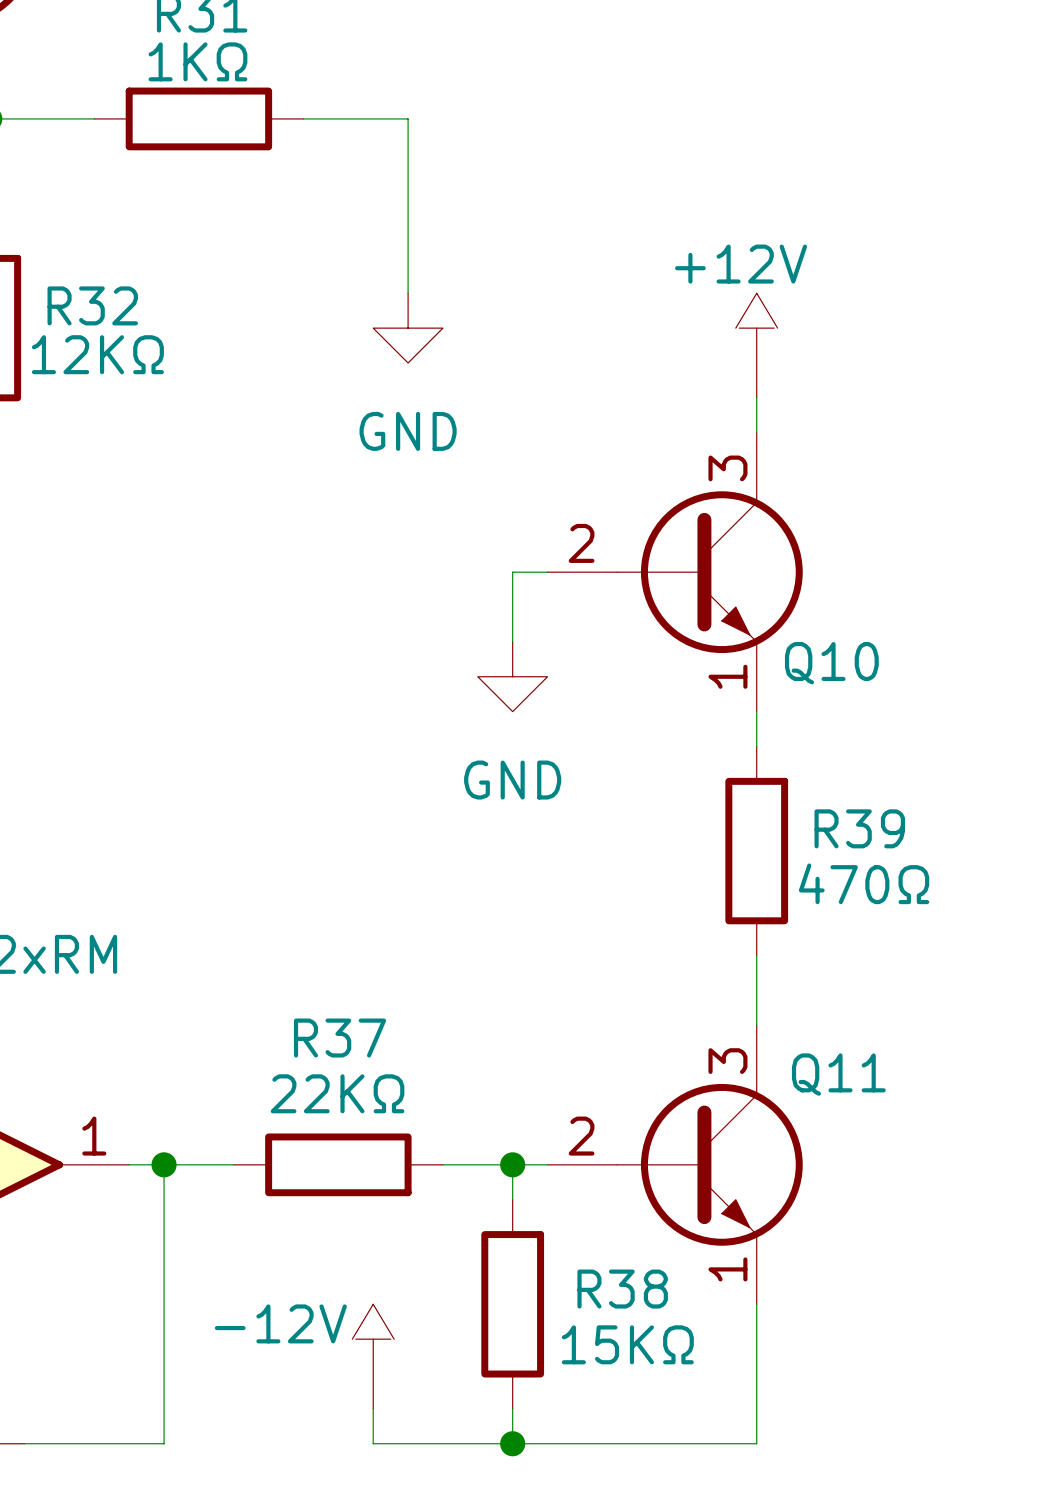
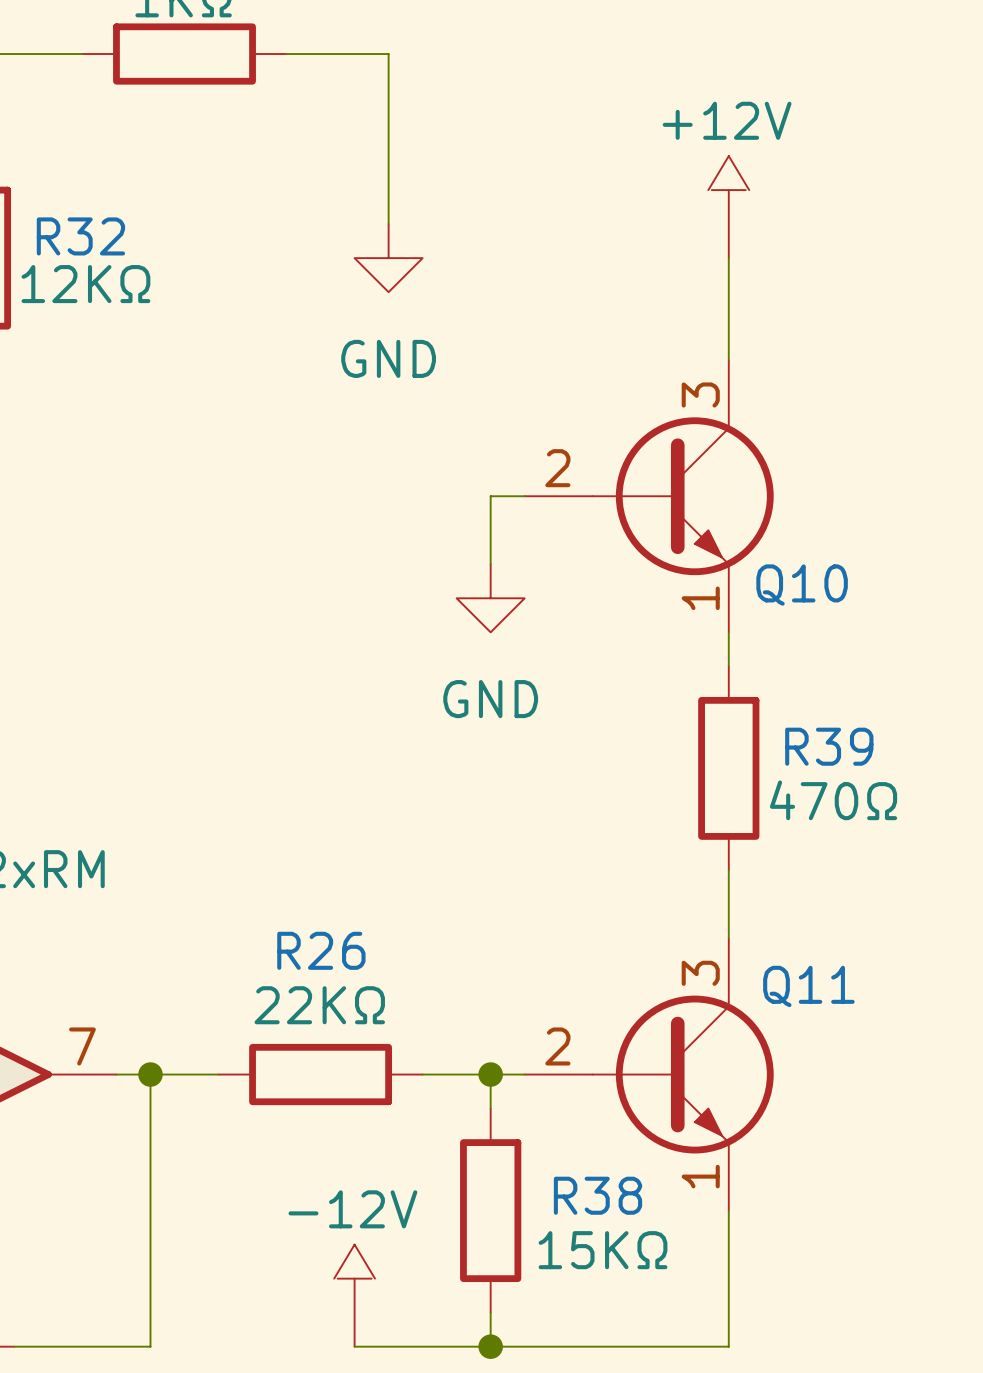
part value position: +12V (741, 264) -> +12V (727, 120)
part position: (756, 345) -> (728, 207)
R37 name: R37 (340, 1038) -> R26 (321, 950)
part pin number: 1 (94, 1136) -> 7 (82, 1046)
part value position: -12V (280, 1323) -> -12V (352, 1209)
part position: (373, 1356) -> (354, 1295)

